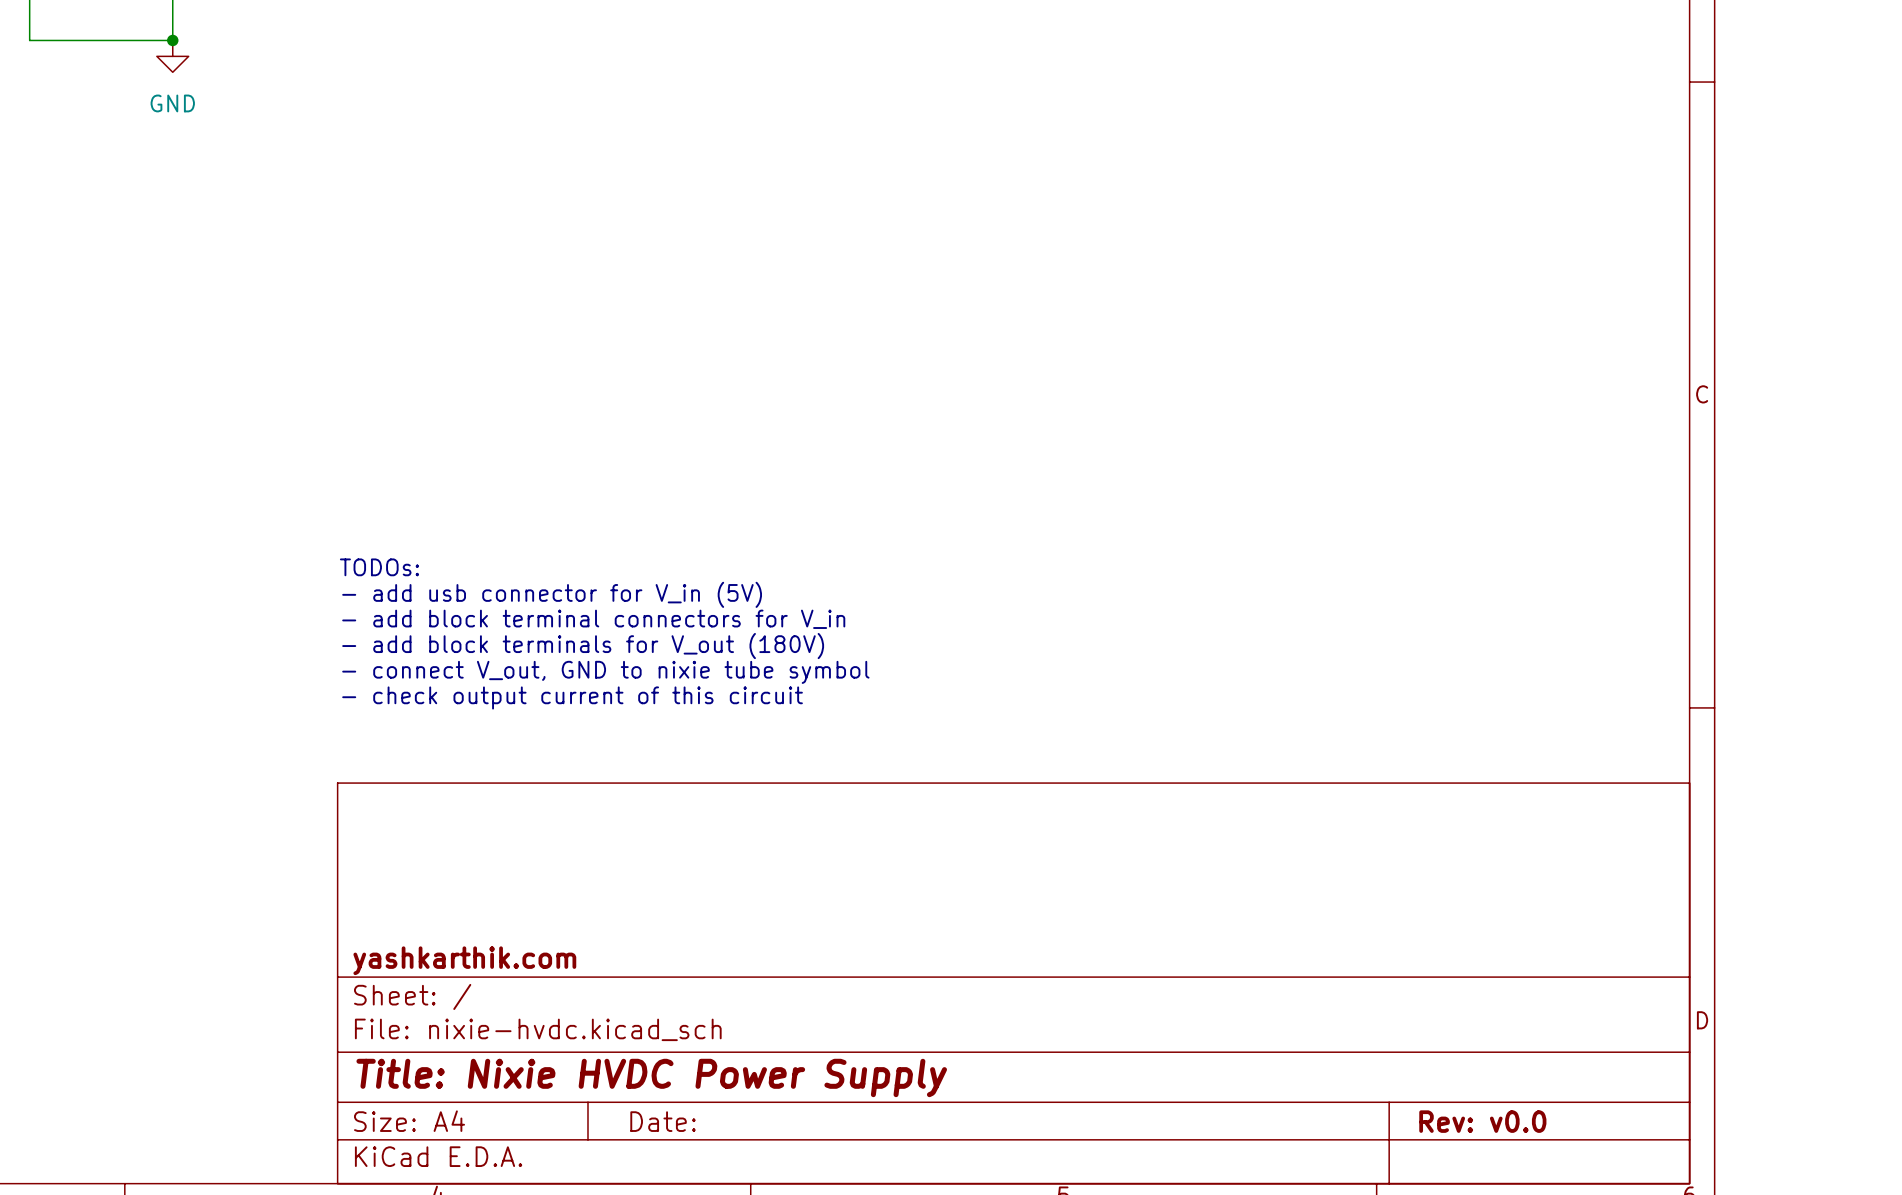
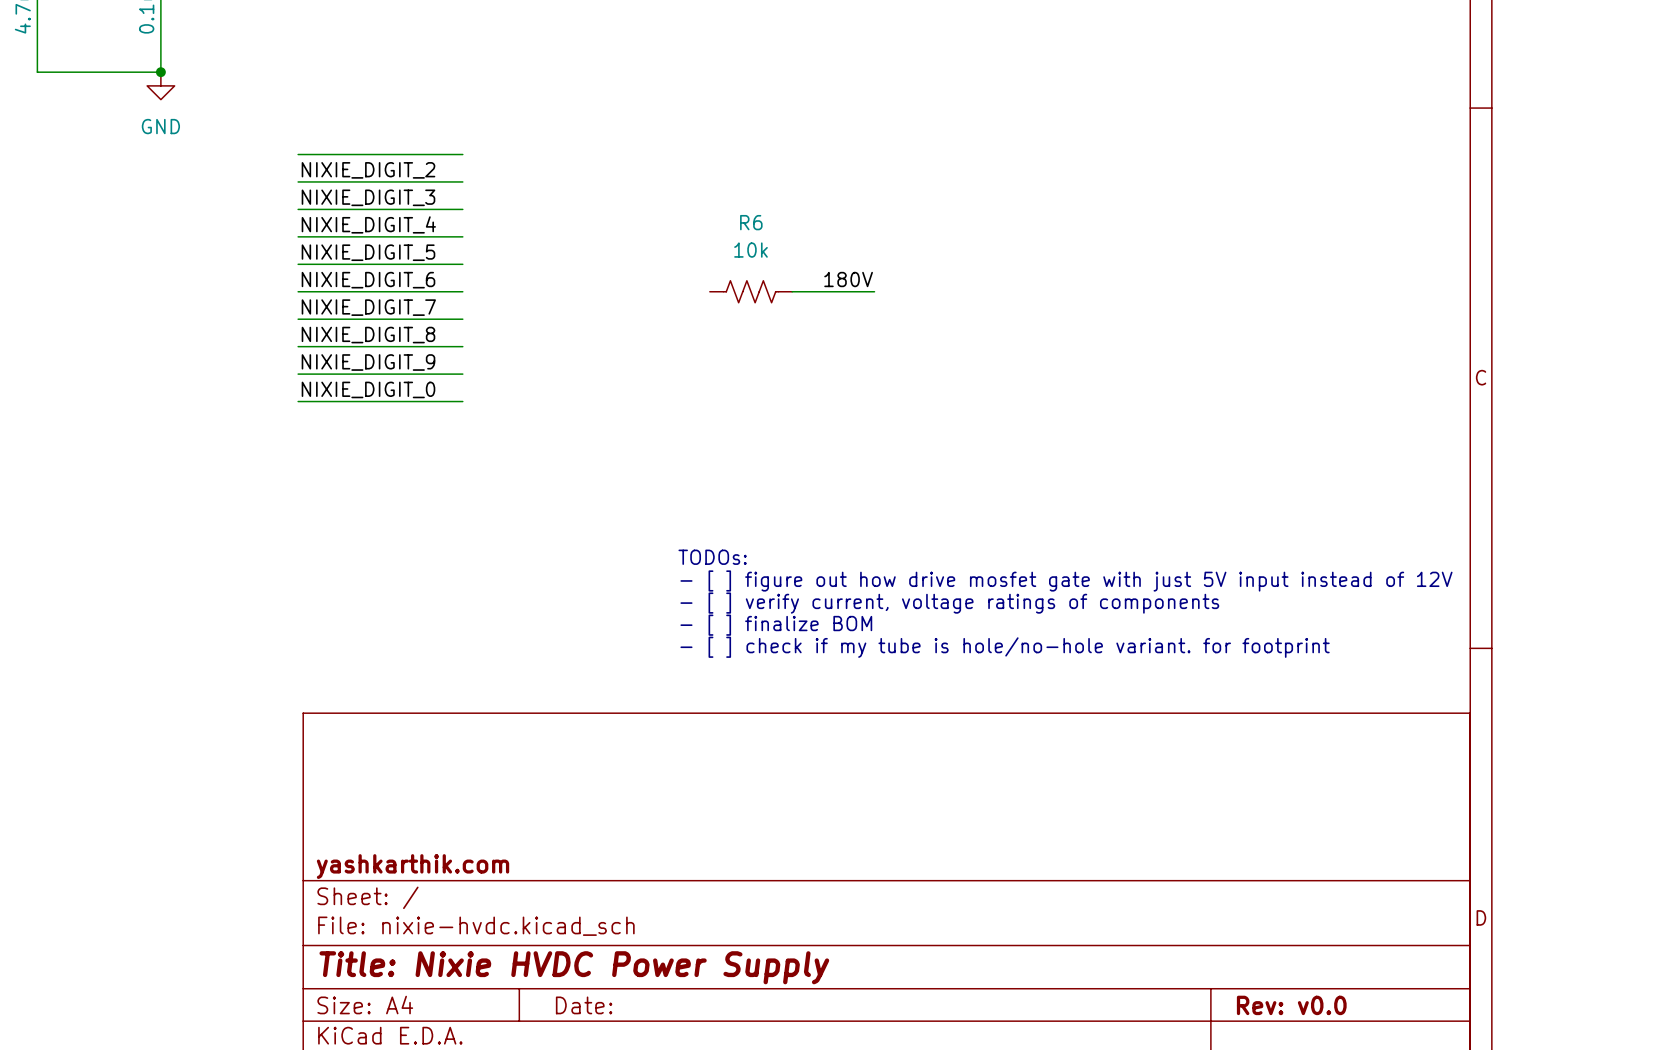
wire: none -> (298, 154) (462, 154)
label: none -> NIXIE_DIGIT_2 (368, 170)
wire: none -> (298, 181) (462, 181)
label: none -> NIXIE_DIGIT_3 (368, 197)
wire: none -> (298, 209) (462, 209)
label: none -> NIXIE_DIGIT_4 (368, 224)
wire: none -> (298, 236) (462, 236)
label: none -> NIXIE_DIGIT_5 (368, 252)
wire: none -> (298, 264) (462, 264)
label: none -> 180V (848, 279)
label: none -> NIXIE_DIGIT_6 (368, 280)
wire: none -> (298, 291) (462, 291)
R6: none -> 10k (751, 291)
wire: none -> (792, 291) (874, 291)
label: none -> NIXIE_DIGIT_7 (368, 307)
wire: none -> (298, 319) (462, 319)
label: none -> NIXIE_DIGIT_8 (368, 335)
wire: none -> (298, 346) (462, 346)
label: none -> NIXIE_DIGIT_9 (368, 362)
wire: none -> (298, 374) (462, 374)
label: none -> NIXIE_DIGIT_0 (368, 389)
wire: none -> (298, 401) (462, 401)
text: TODOs: (379, 567) -> none
text: - add usb connector for V_in (5V) (552, 594) -> none
text: none -> TODOs: (712, 557)
text: - add block terminal connectors for V_in (593, 619) -> none
text: none -> - [ ] figure out how drive mosfet gate with just 5V input instead of 12V (1066, 580)
text: - add block terminals for V_out (180V) (583, 646) -> none
text: none -> - [ ] verify current, voltage ratings of components (949, 603)
text: - connect V_out, GND to nixie tube symbol (605, 672) -> none
text: none -> - [ ] finalize BOM (776, 625)
text: - check output current of this circuit (572, 697) -> none
text: none -> - [ ] check if my tube is hole/no-hole variant. for footprint (1005, 647)

